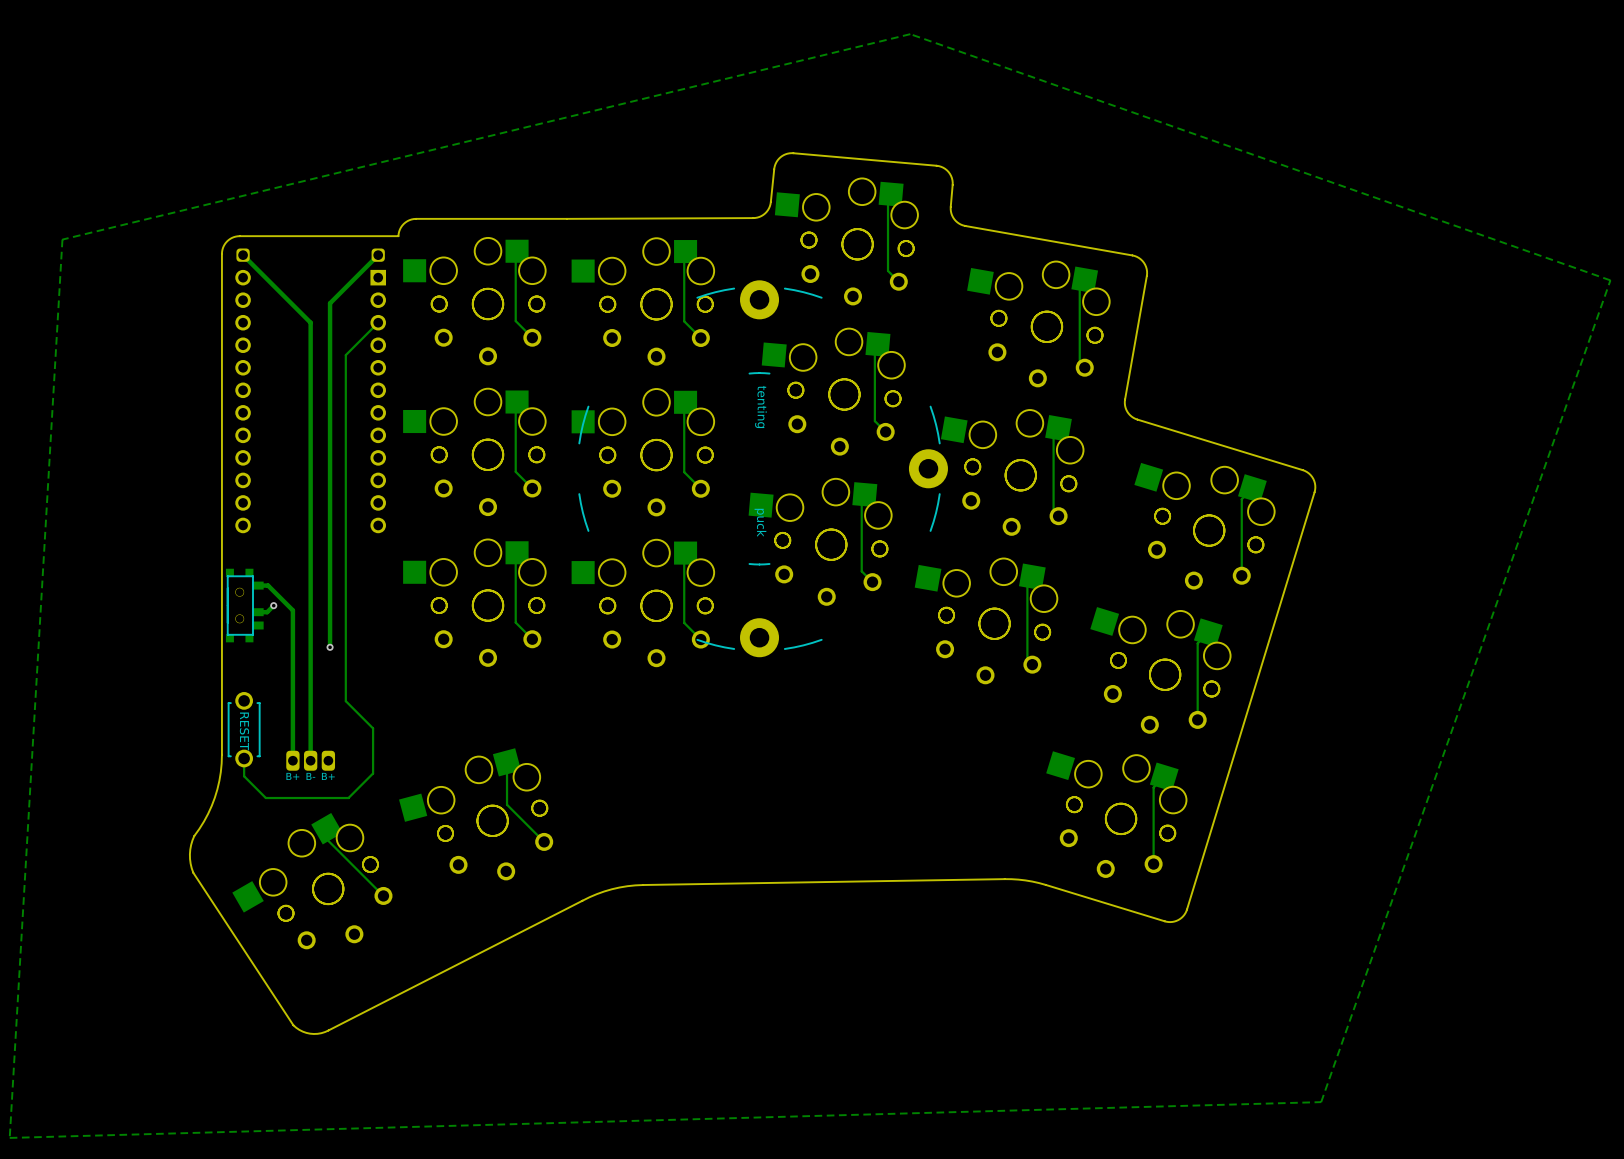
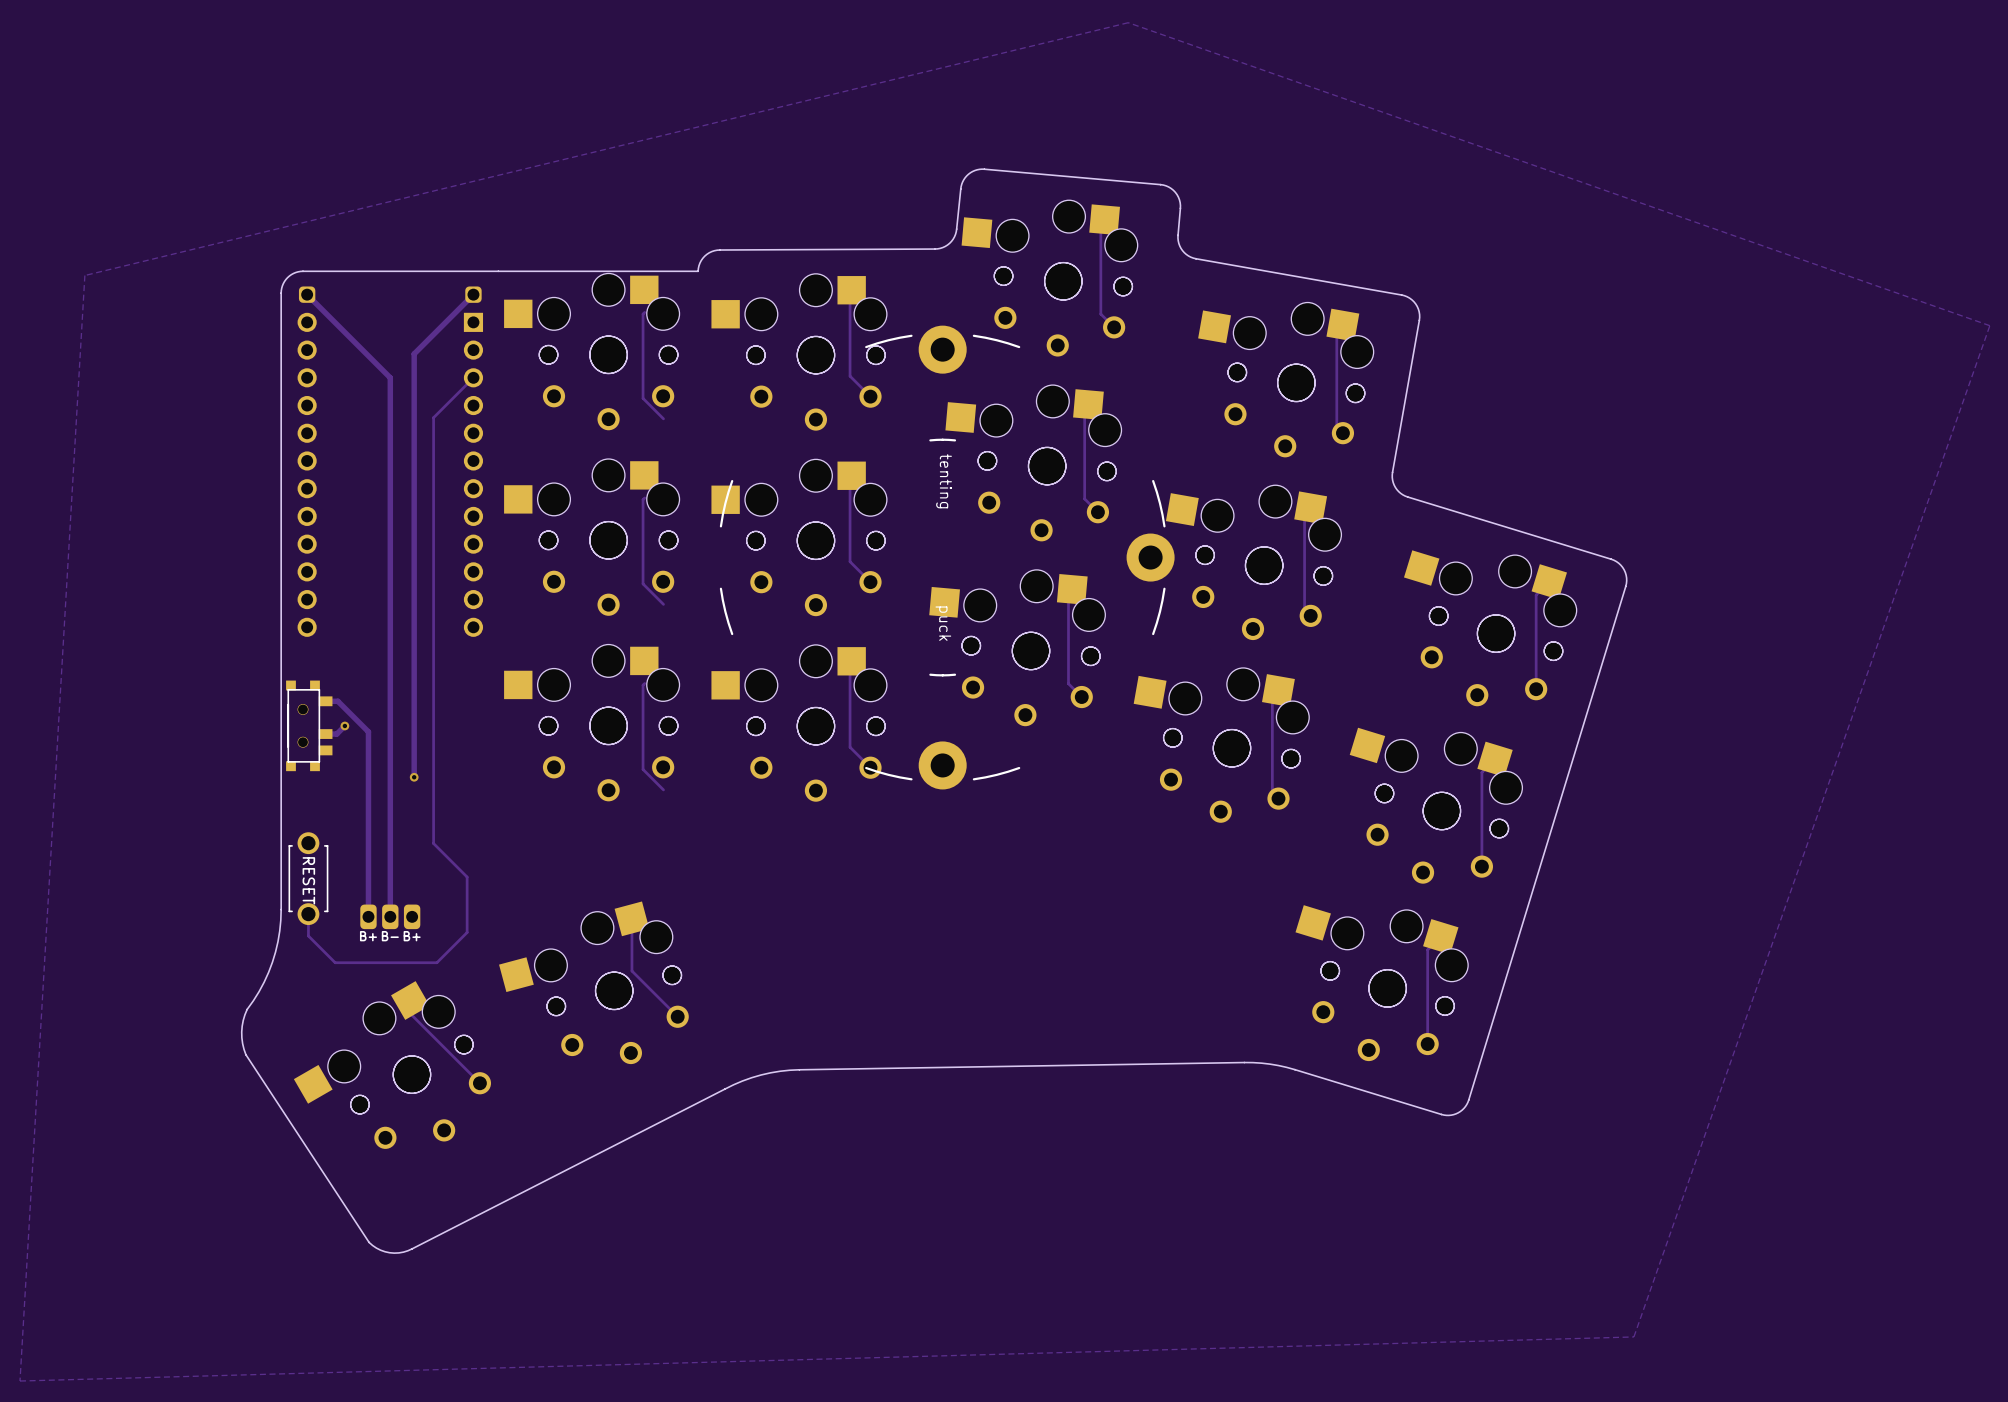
board edge: (753, 218) (416, 218) (403, 223) (398, 236) -> (934, 249) (717, 250) (709, 252) (702, 258) (698, 271) (498, 271)
track: (517, 251) (515, 321) (532, 337) -> (644, 312) (643, 314) (643, 398) (663, 418)
track: (517, 402) (515, 471) (532, 488) -> (644, 497) (643, 499) (643, 583) (663, 604)
track: (517, 552) (515, 622) (532, 639) -> (644, 683) (643, 685) (643, 769) (663, 789)

